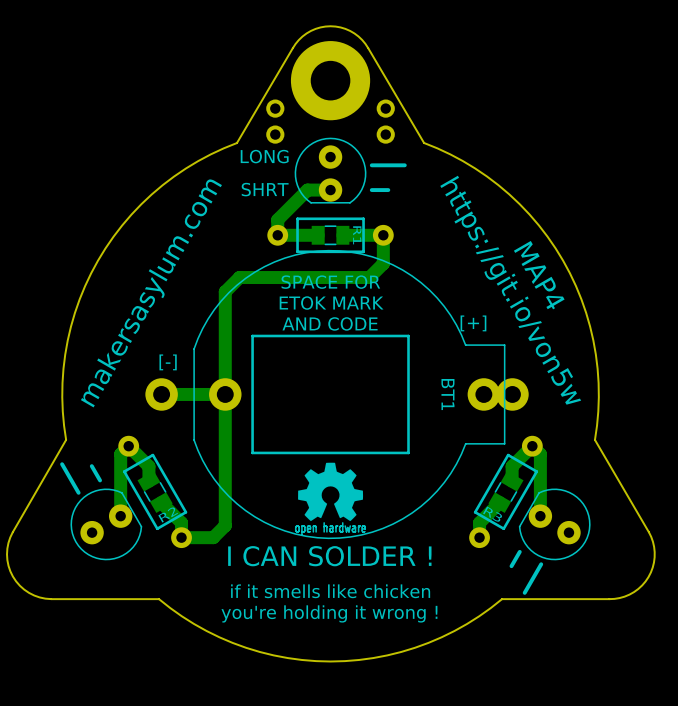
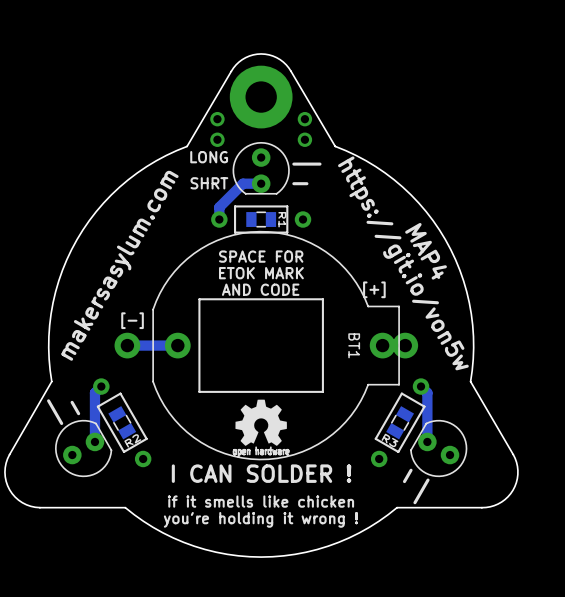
track: (318, 235) (277, 235) -> none
track: (342, 235) (383, 235) (383, 263) (369, 277) (239, 277) (225, 291) (225, 525) (213, 537) (181, 537) (181, 522) (161, 502) -> none
track: (128, 446) (148, 466) (148, 481) -> none
track: (532, 446) (512, 466) (512, 481) -> none
track: (499, 502) (479, 522) (479, 537) -> none

